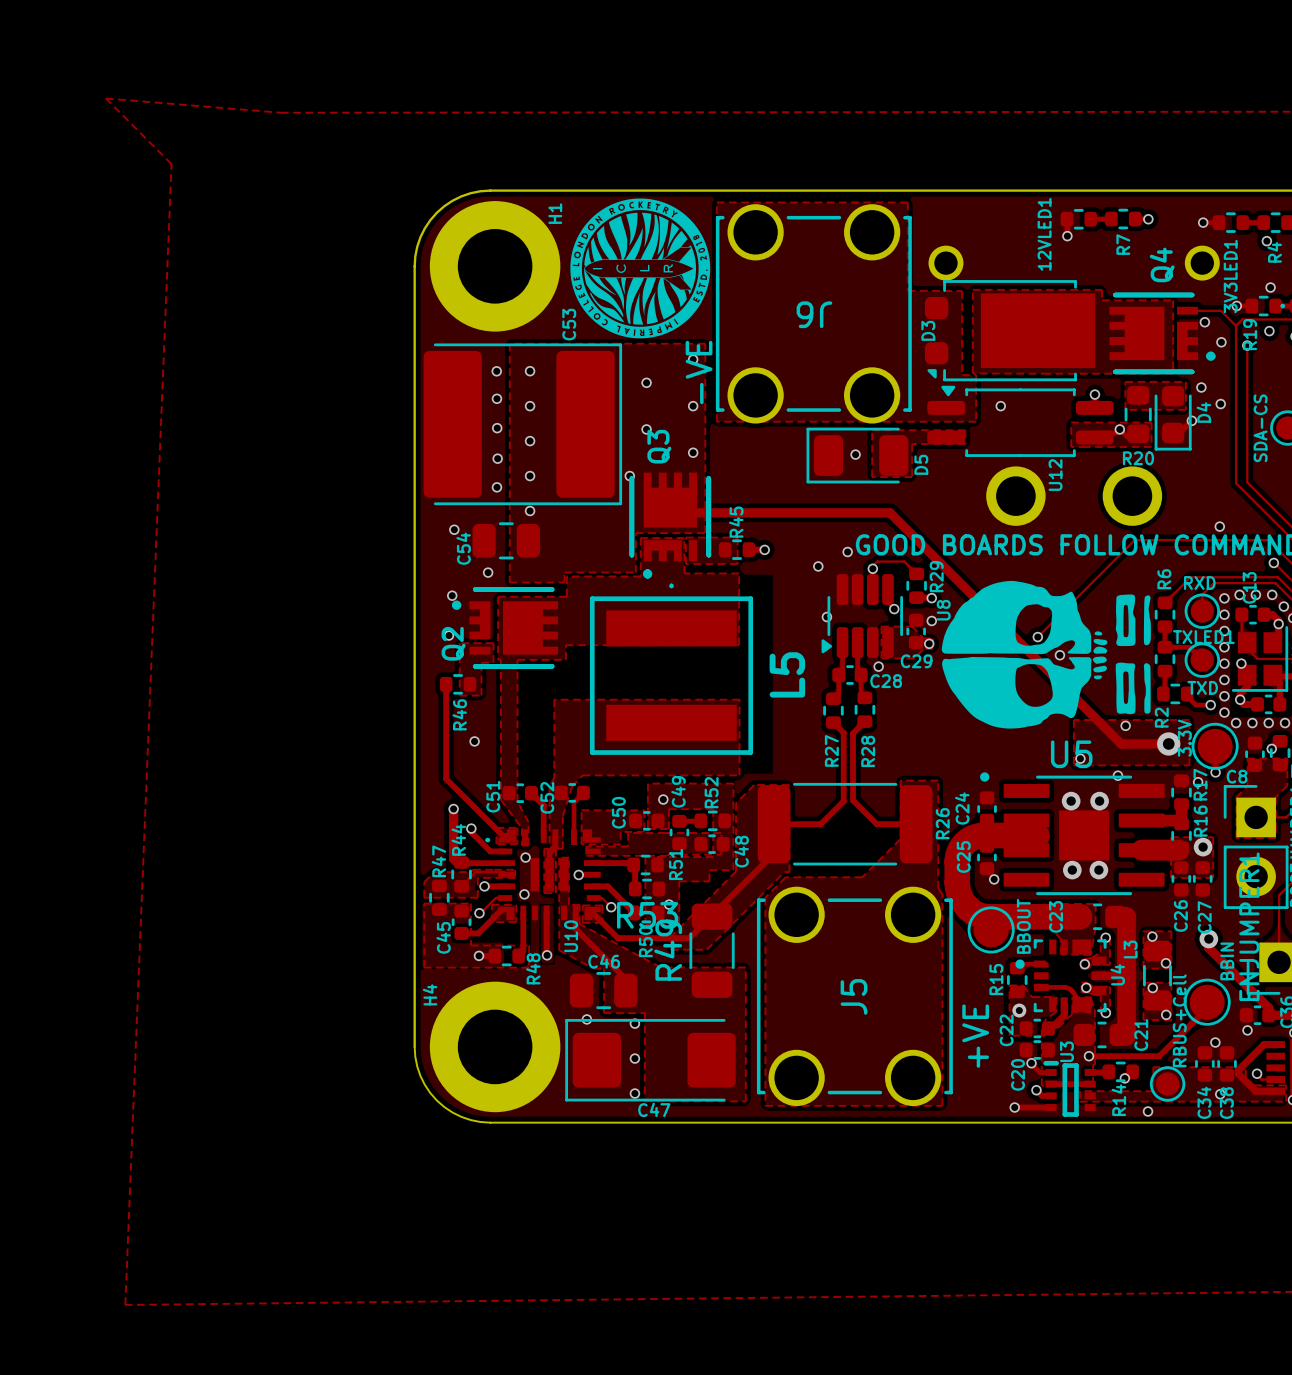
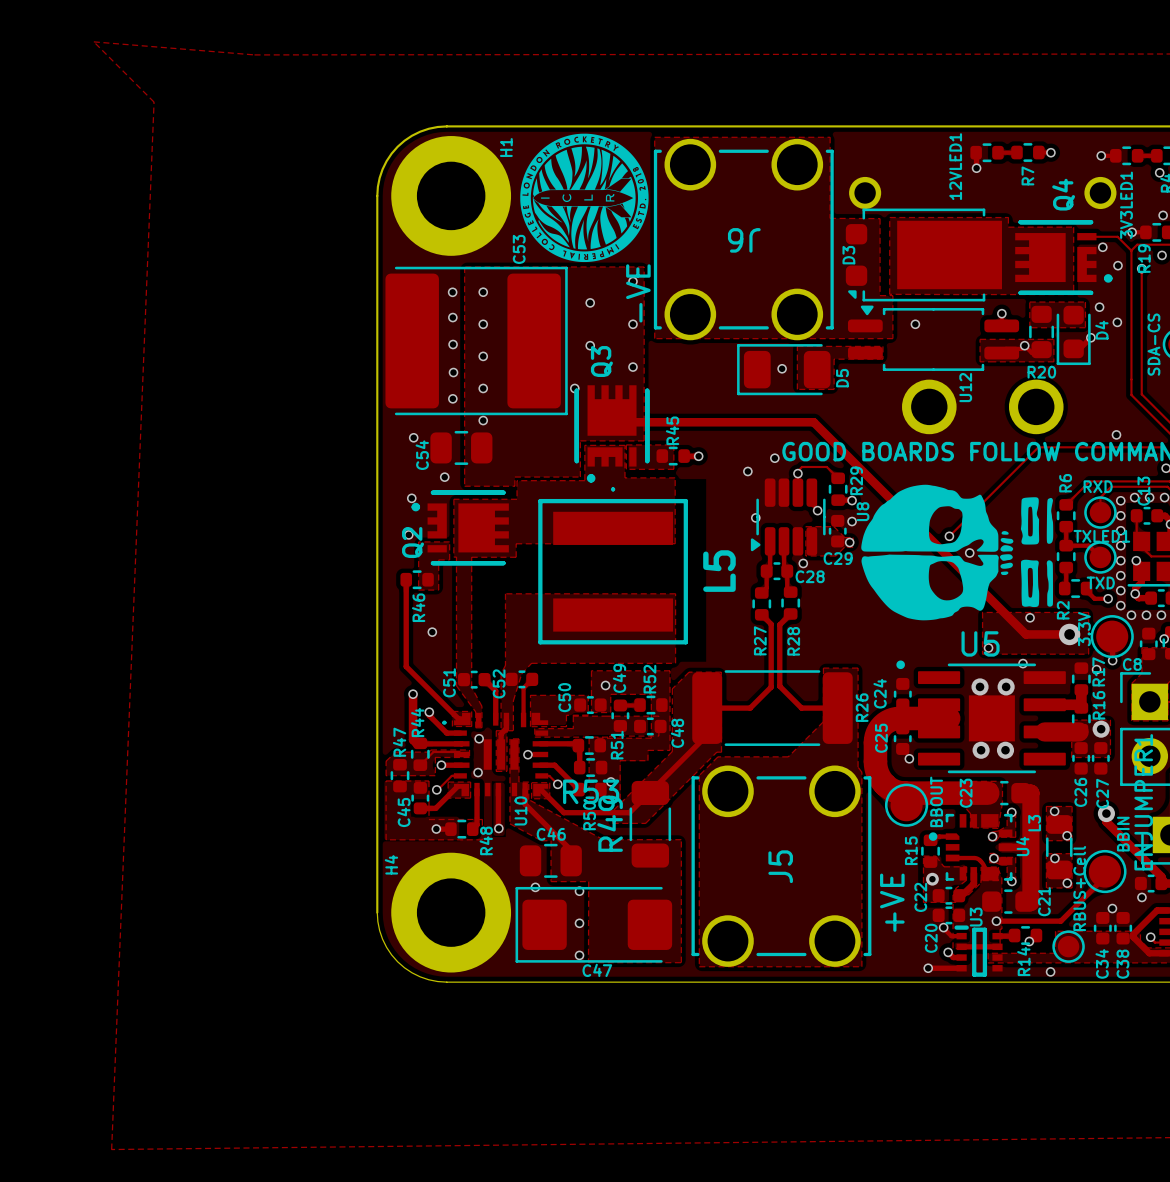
via: (1220, 1094) -> none

